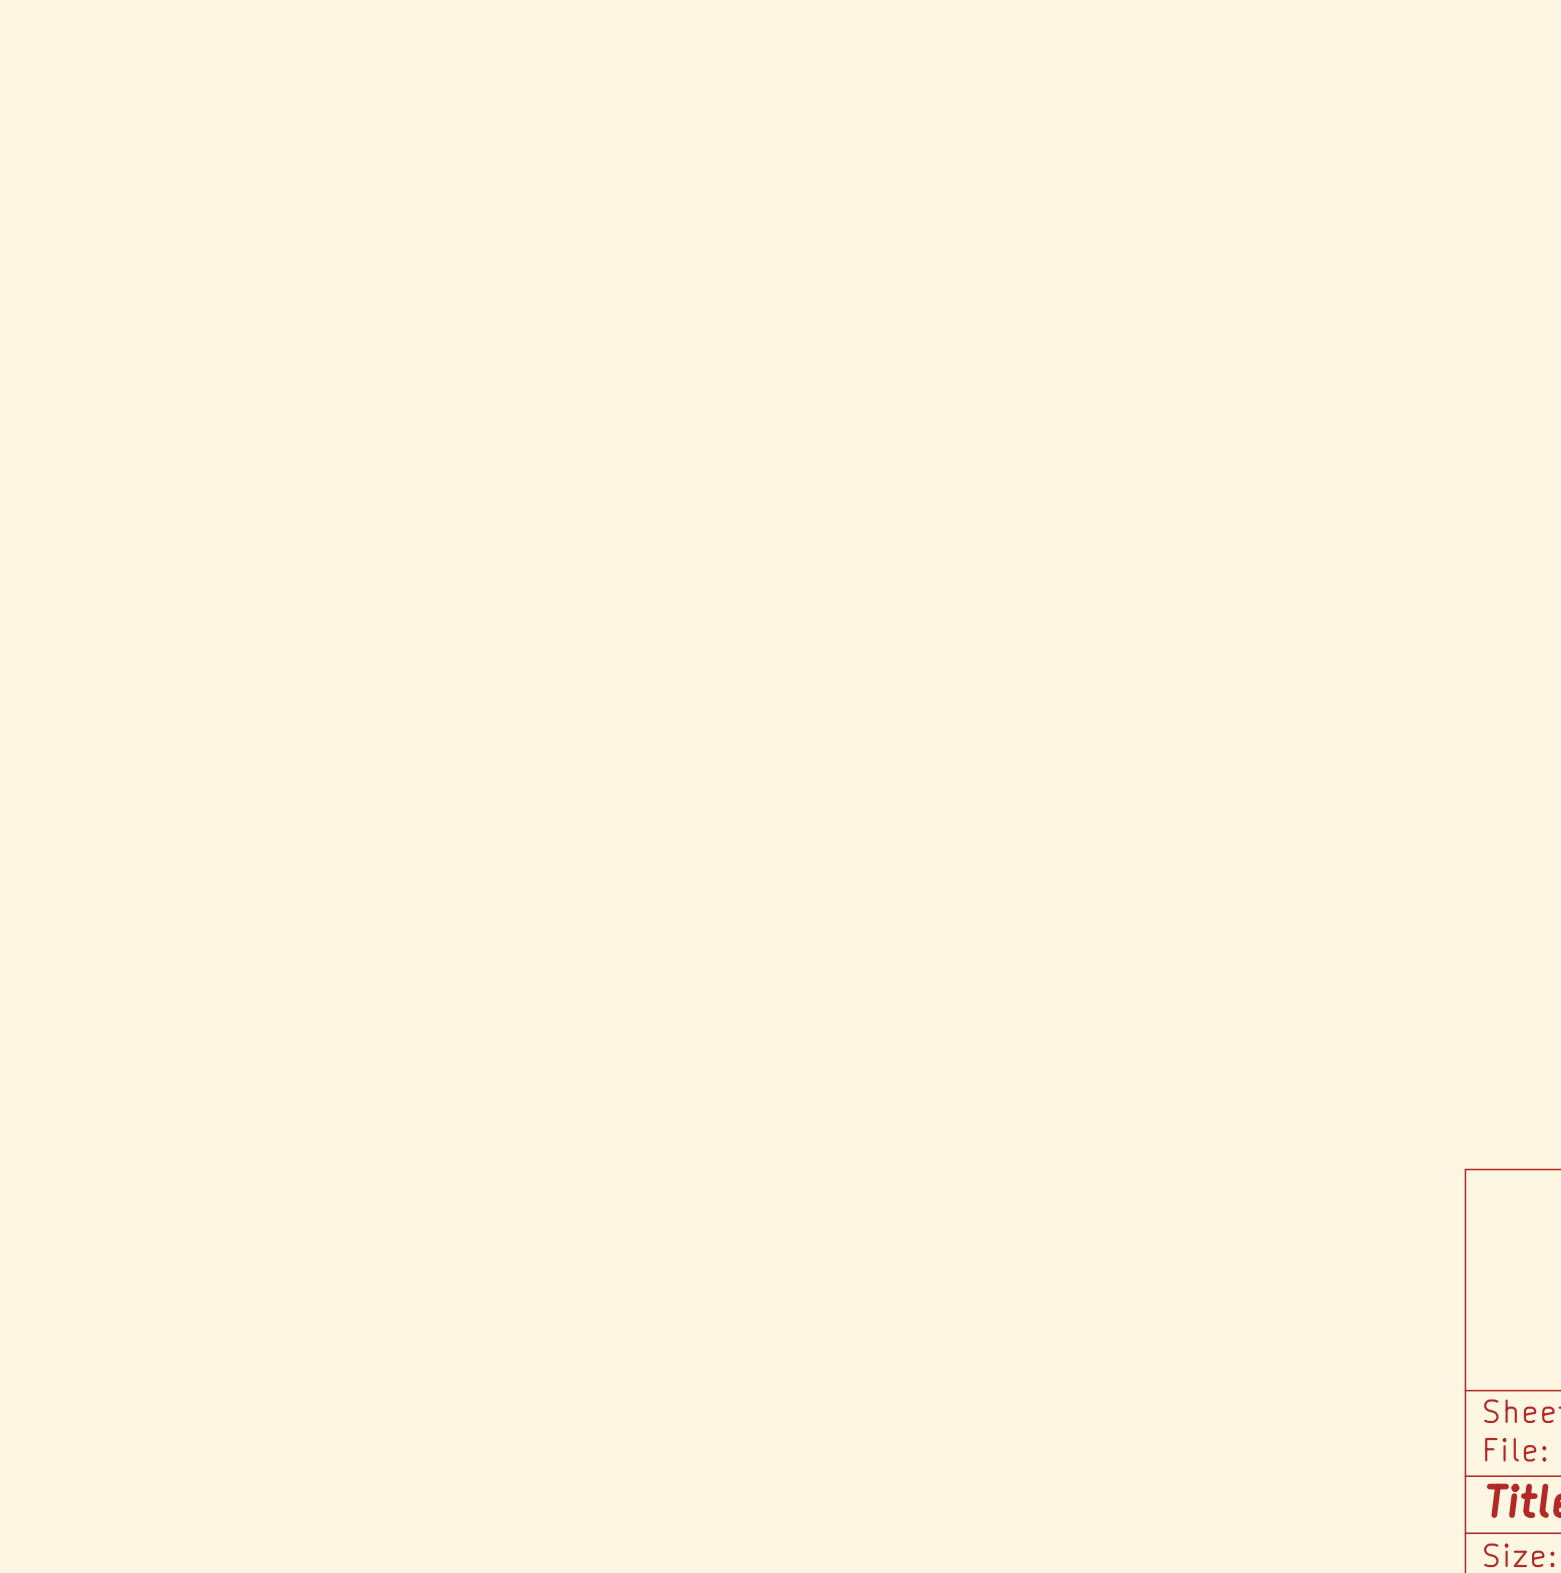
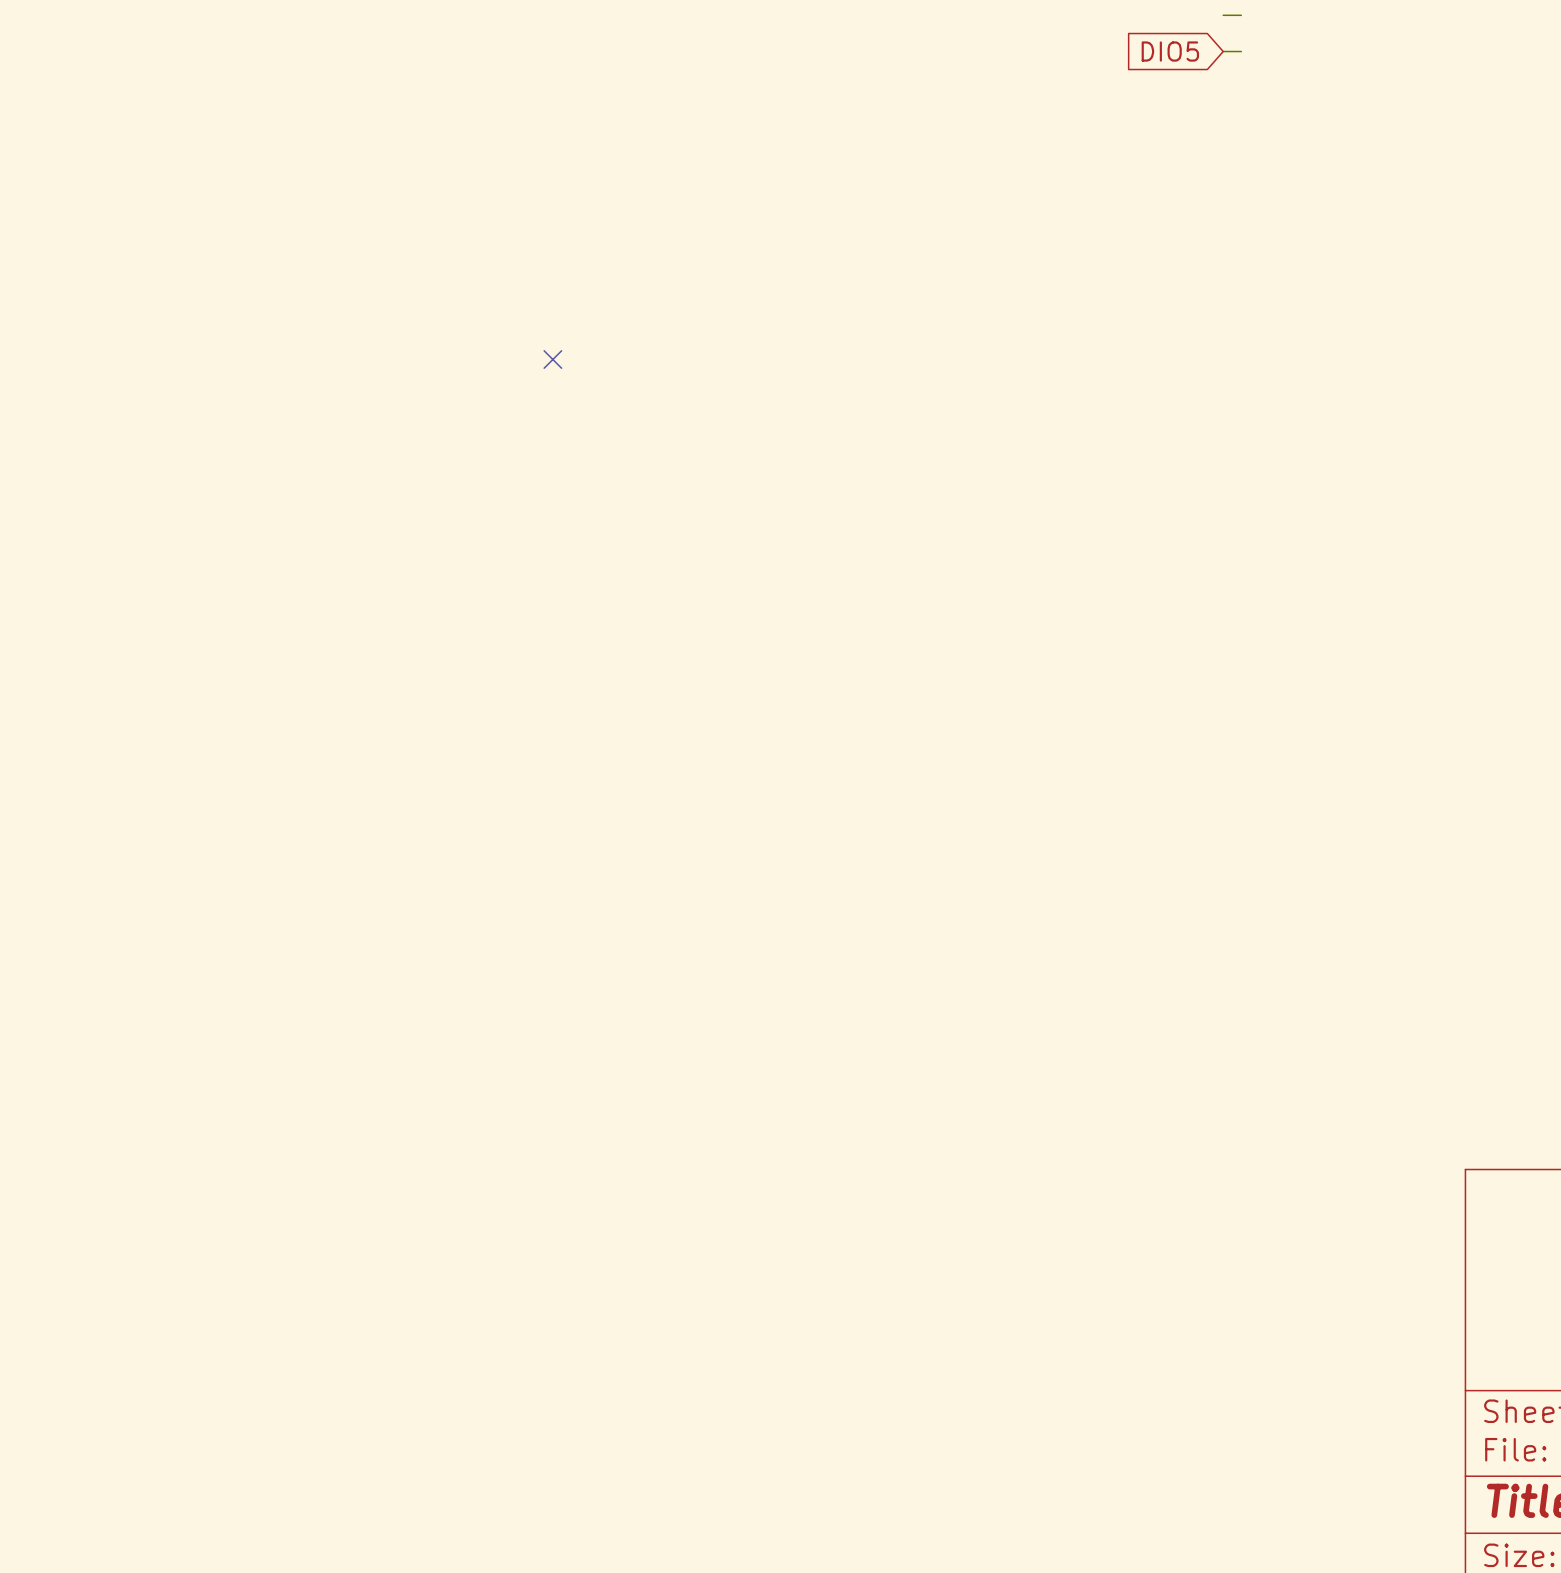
wire: none -> (1223, 15) (1241, 15)
global label: none -> DIO5 (1170, 51)
wire: none -> (1223, 51) (1241, 51)
no-connect mark: none -> (552, 359)

